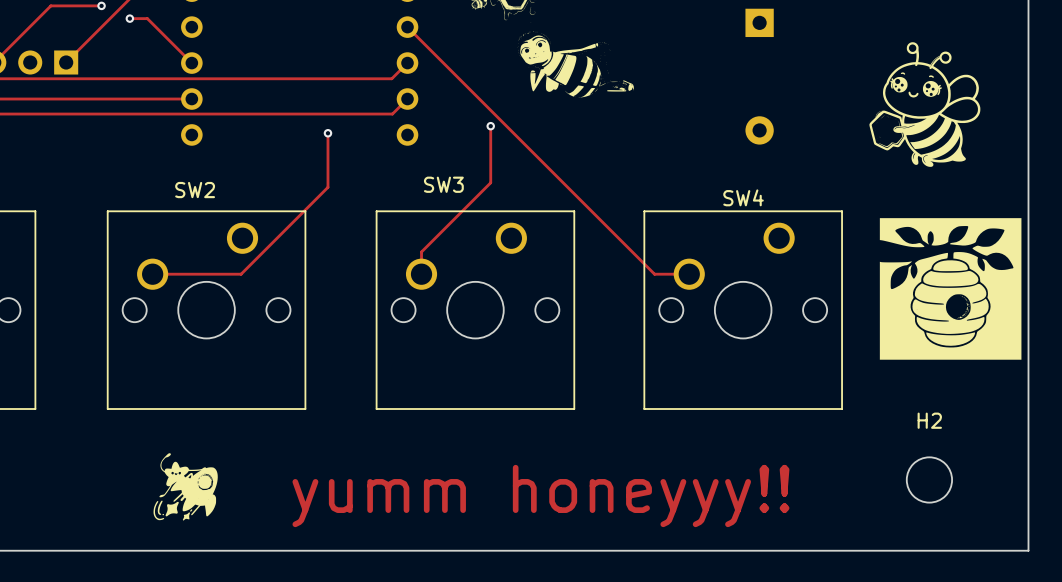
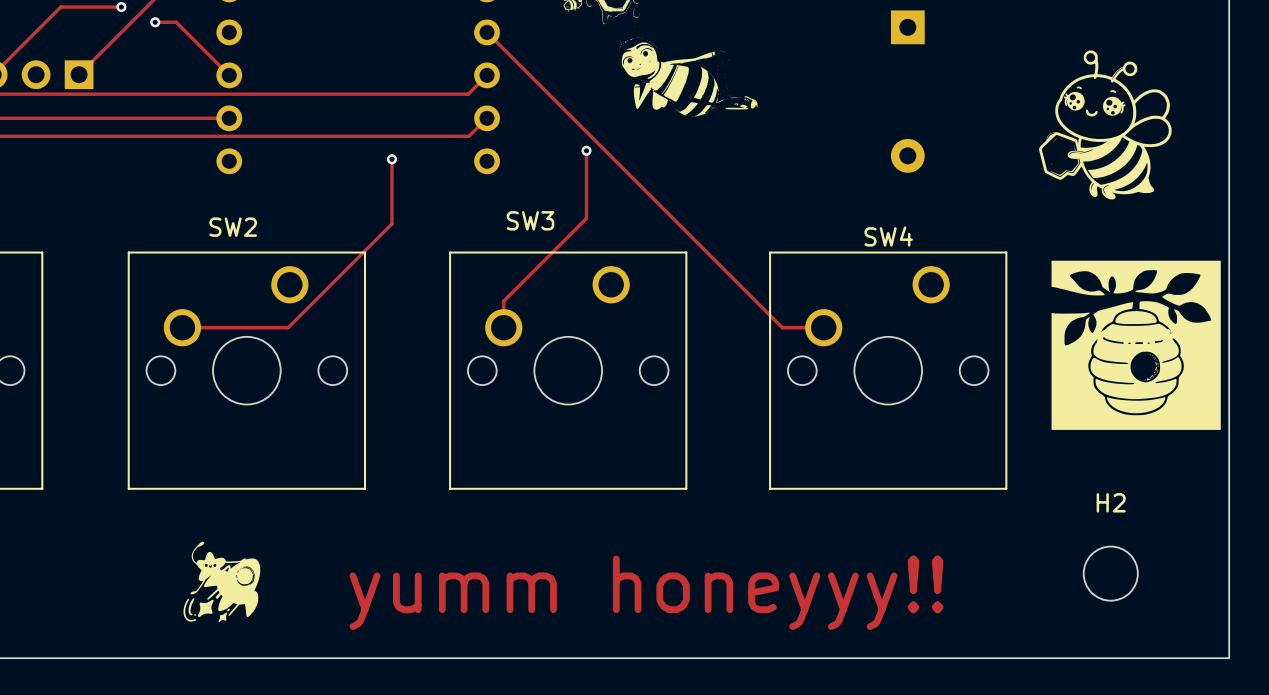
drawing: [879, 218, 1022, 360] -> none
part: none -> (1136, 345)

